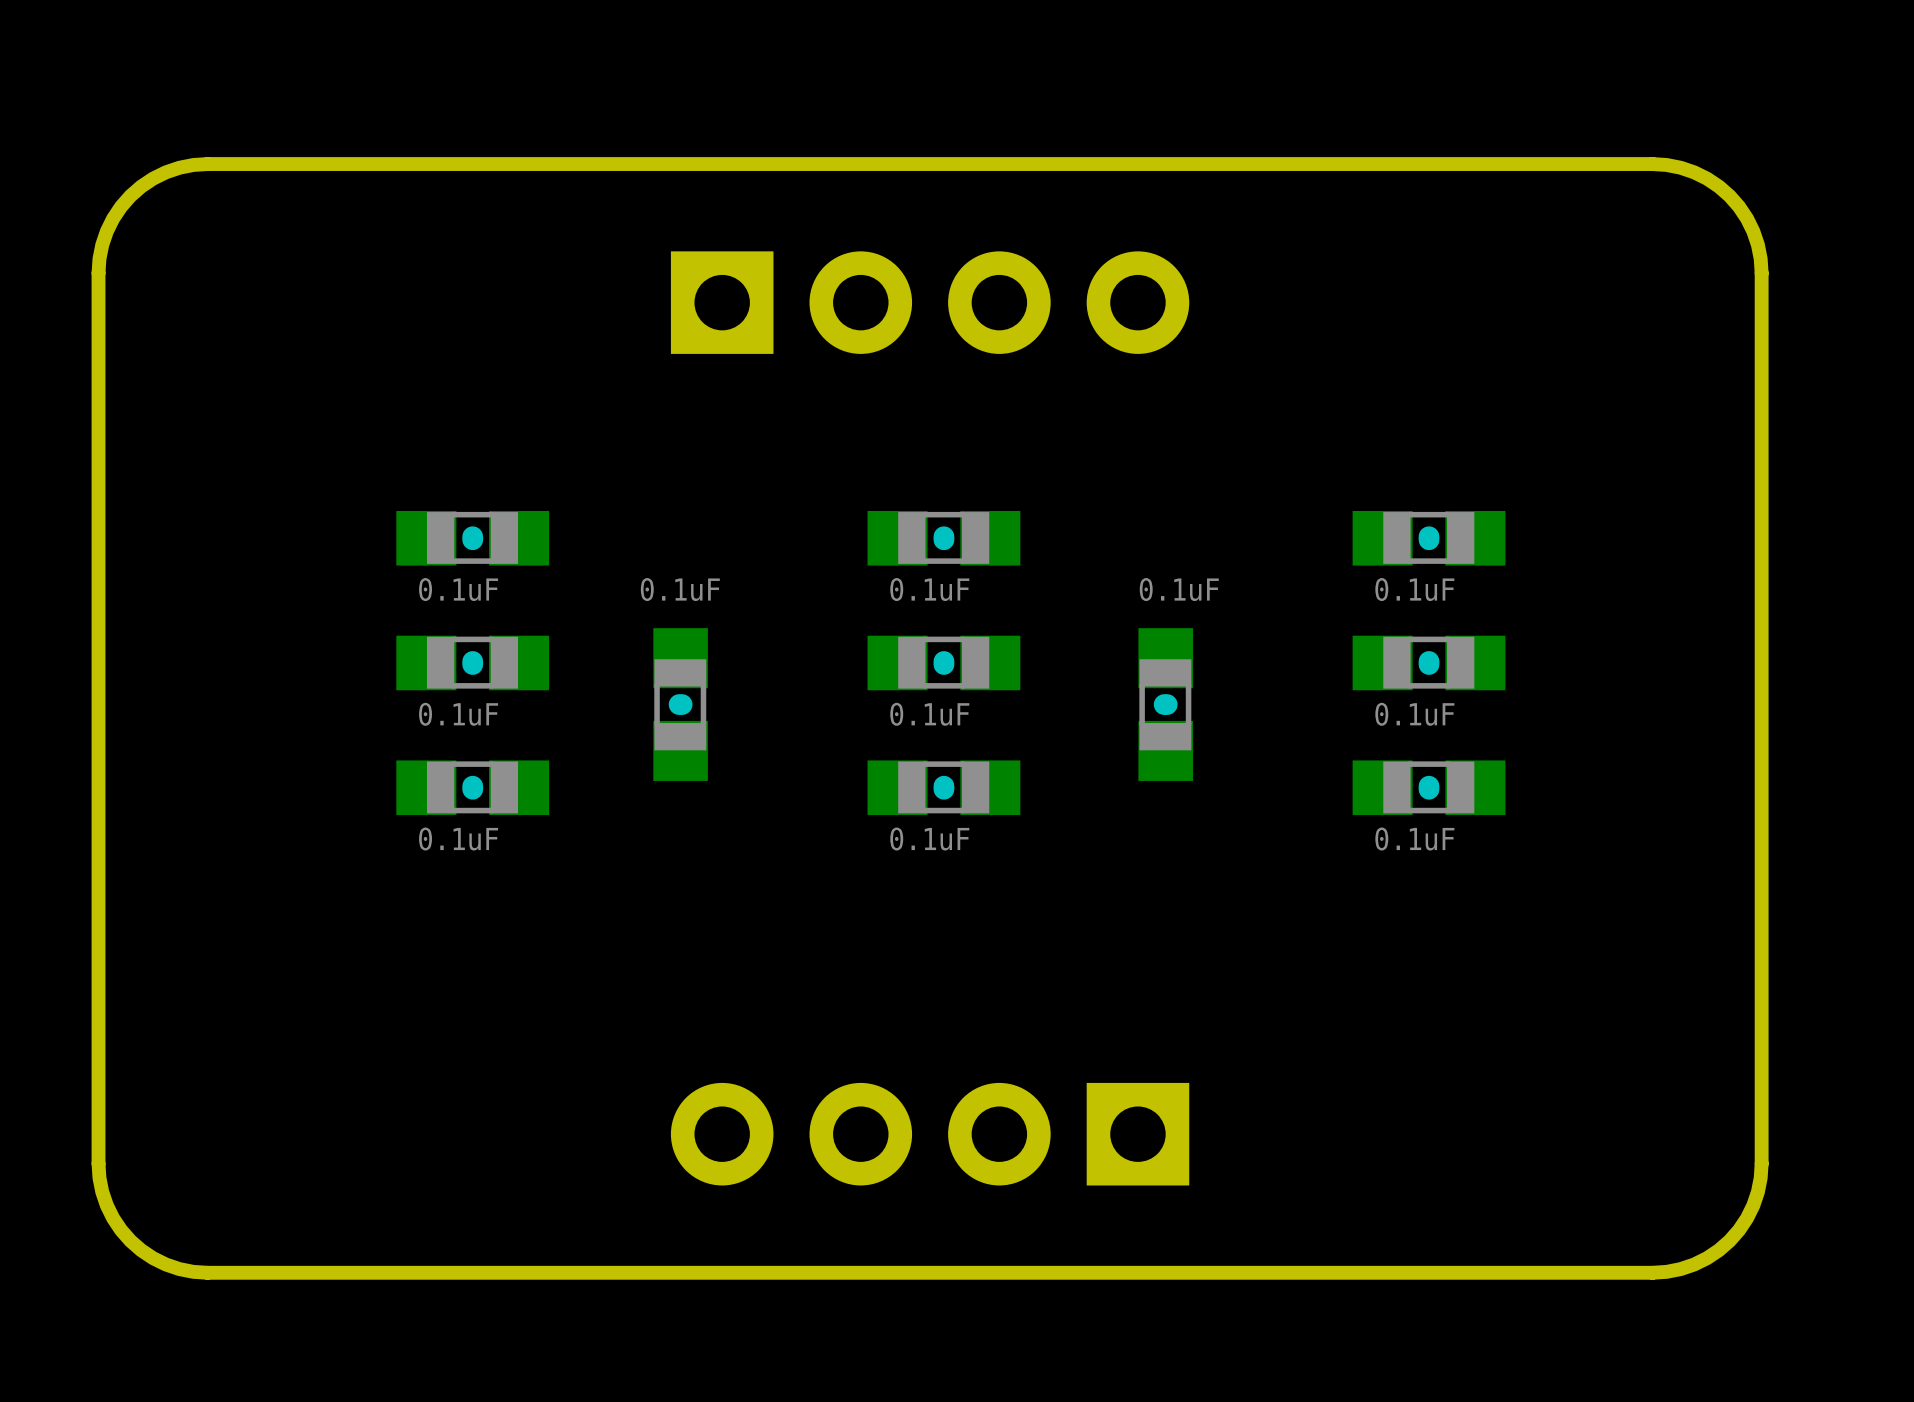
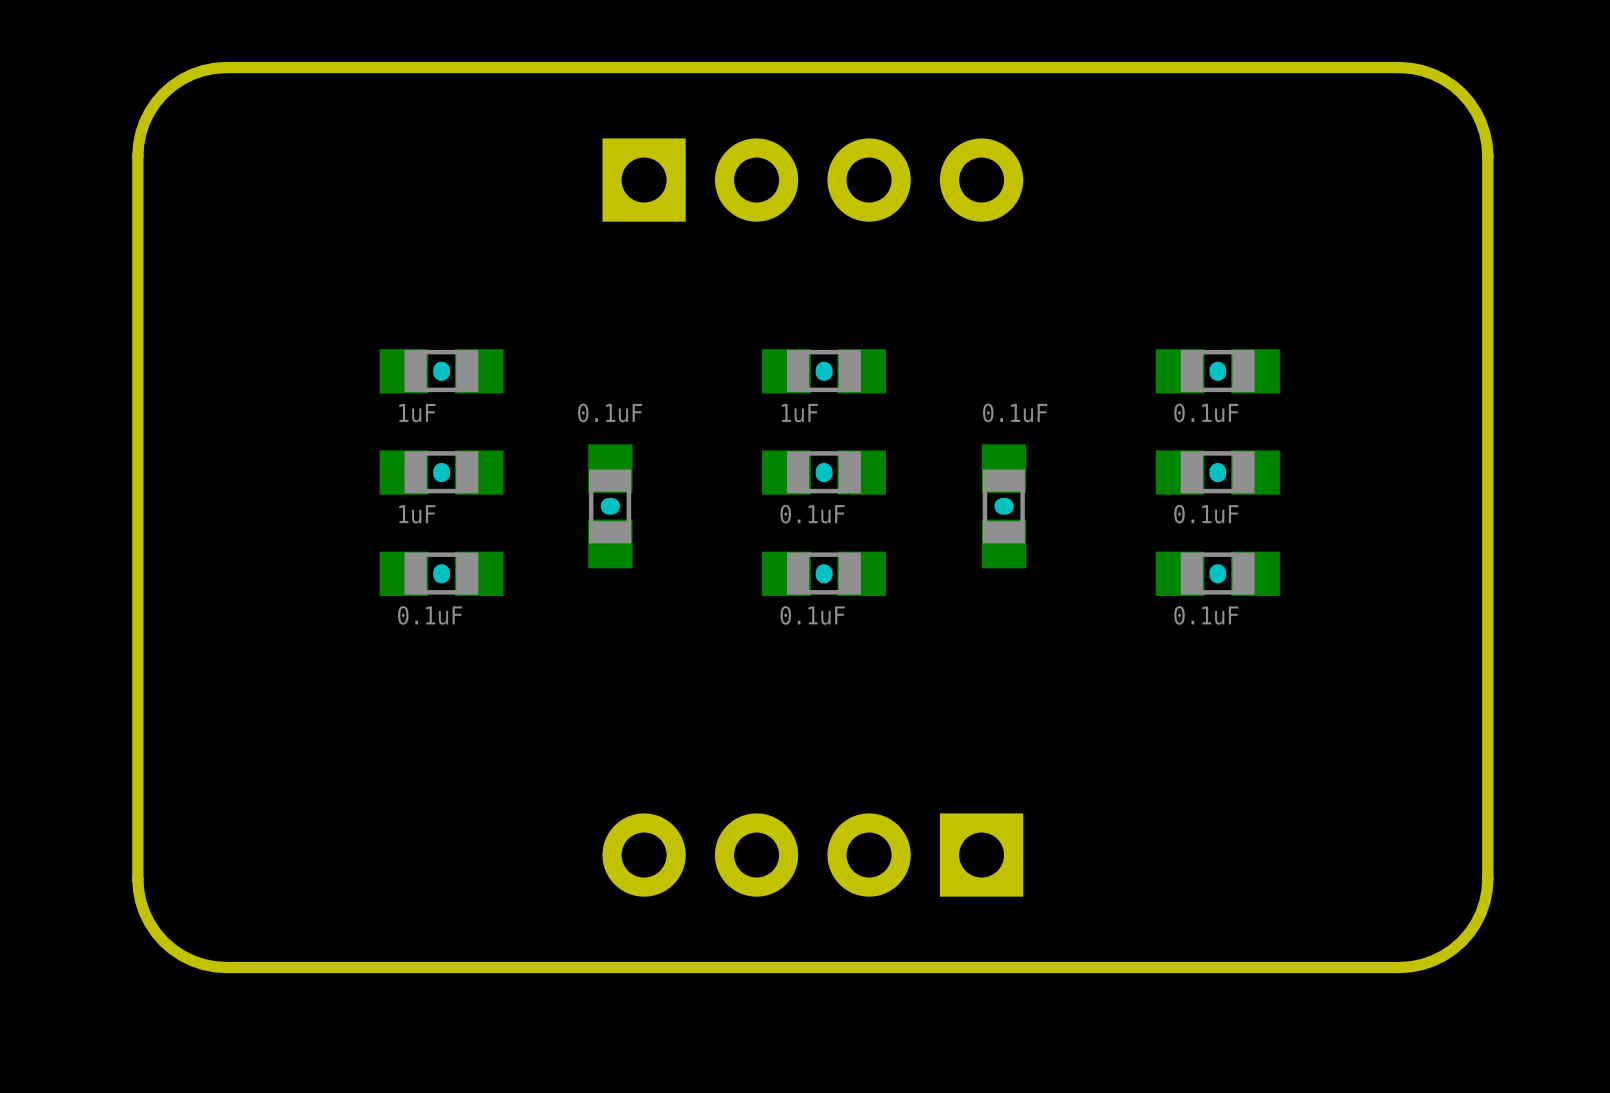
part value: 0.1uF (458, 589) -> 1uF (417, 413)
part value: 0.1uF (929, 589) -> 1uF (799, 413)
part value: 0.1uF (458, 714) -> 1uF (417, 514)

